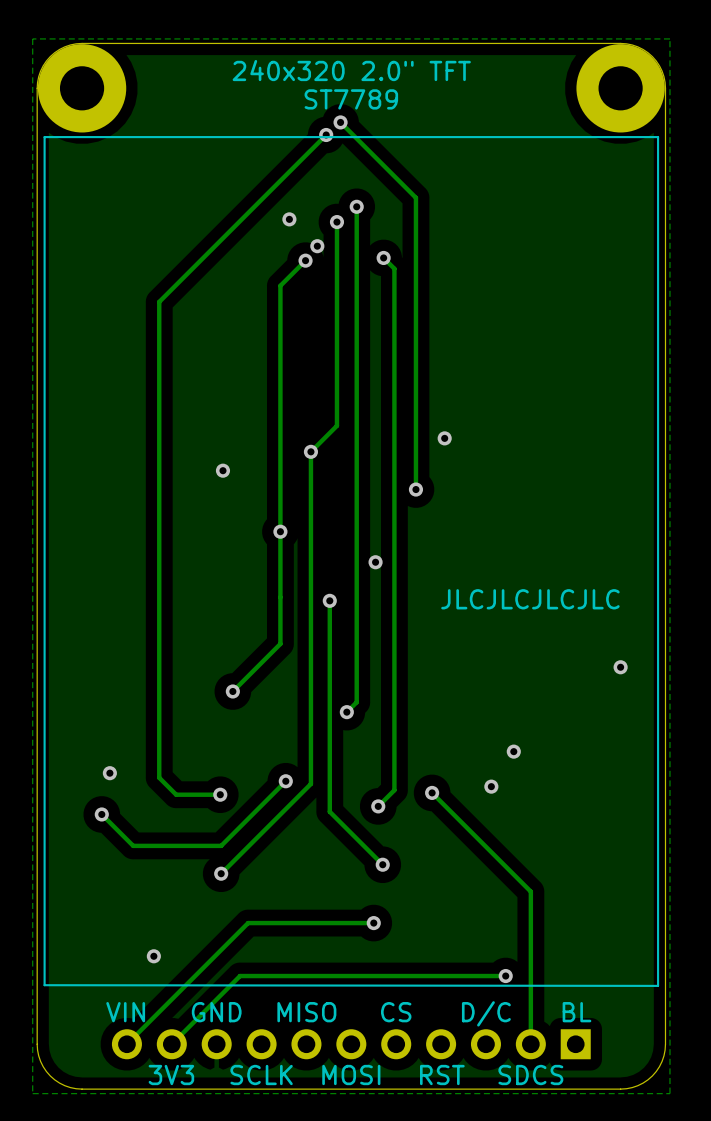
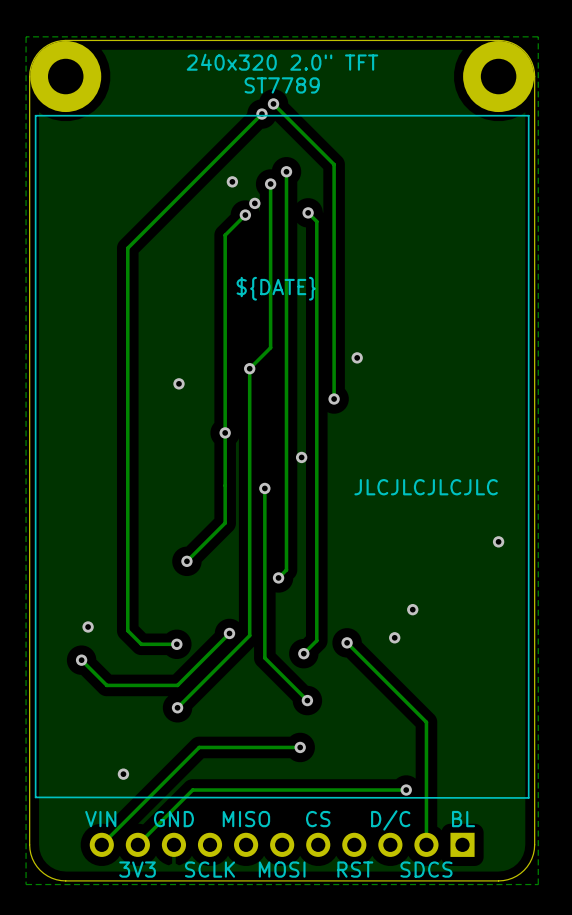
text: none -> ${DATE} (276, 288)

